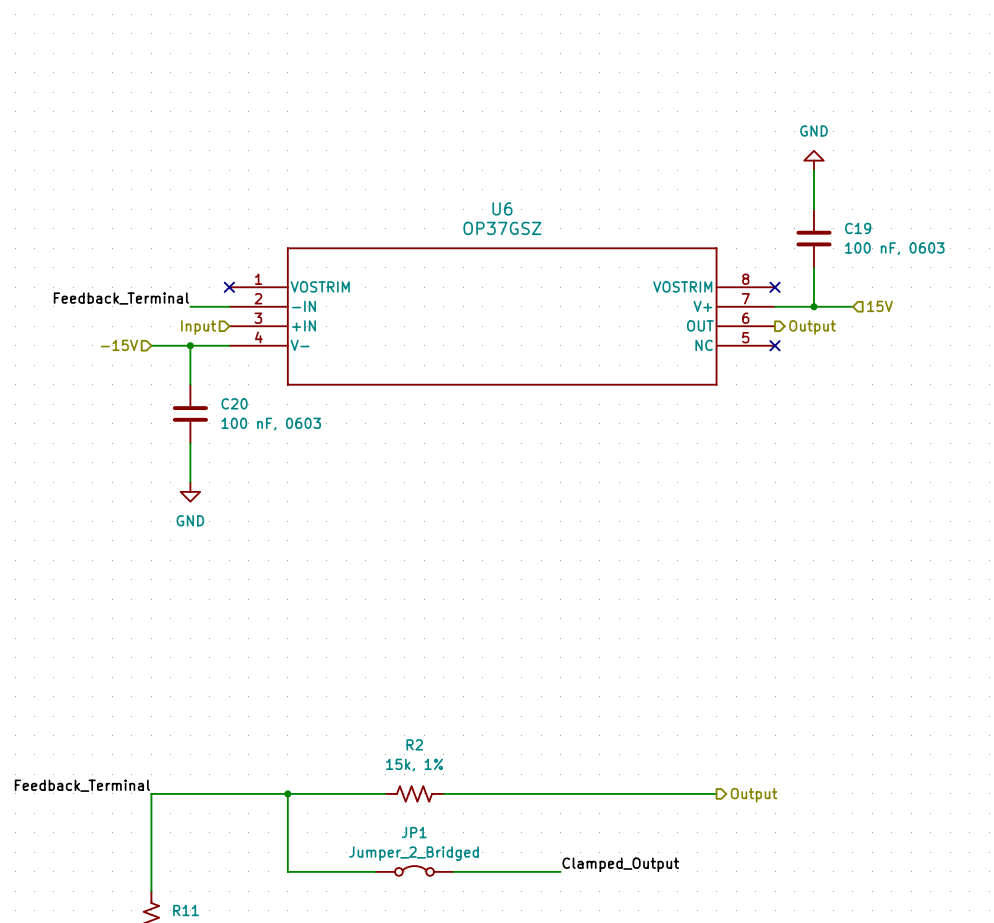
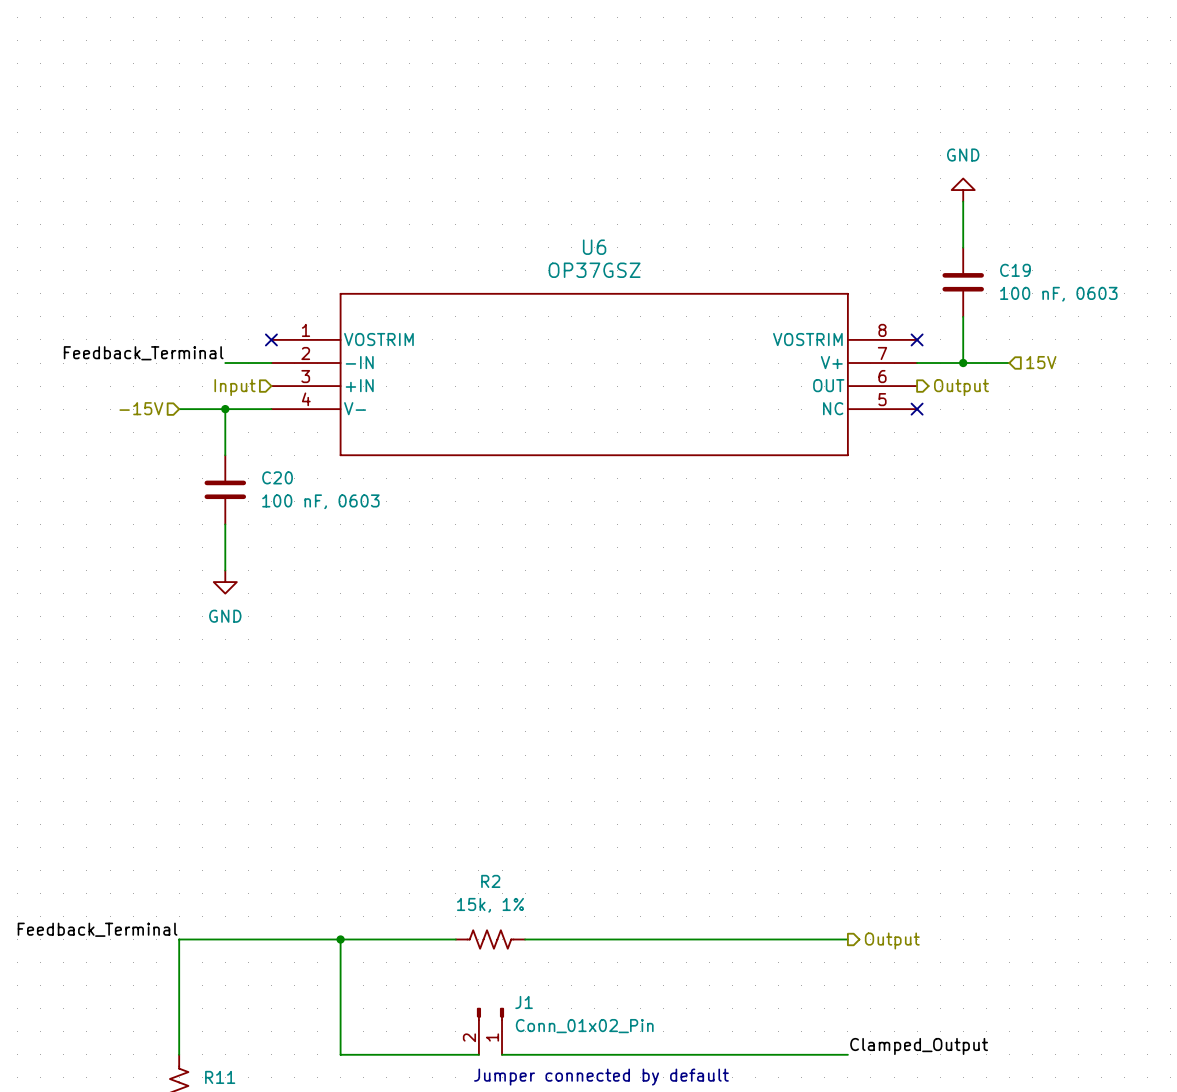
label position: Clamped_Output (620, 864) -> Clamped_Output (919, 1046)
JP1: Jumper_2_Bridged (414, 870) -> none
wire: (287, 871) (375, 871) -> (340, 1031) (340, 1054) (478, 1054)
J1: none -> Conn_01x02_Pin (490, 1031)
wire: (453, 871) (560, 871) -> none
wire: none -> (502, 1054) (847, 1054)
text: none -> Jumper connected by default (601, 1077)

